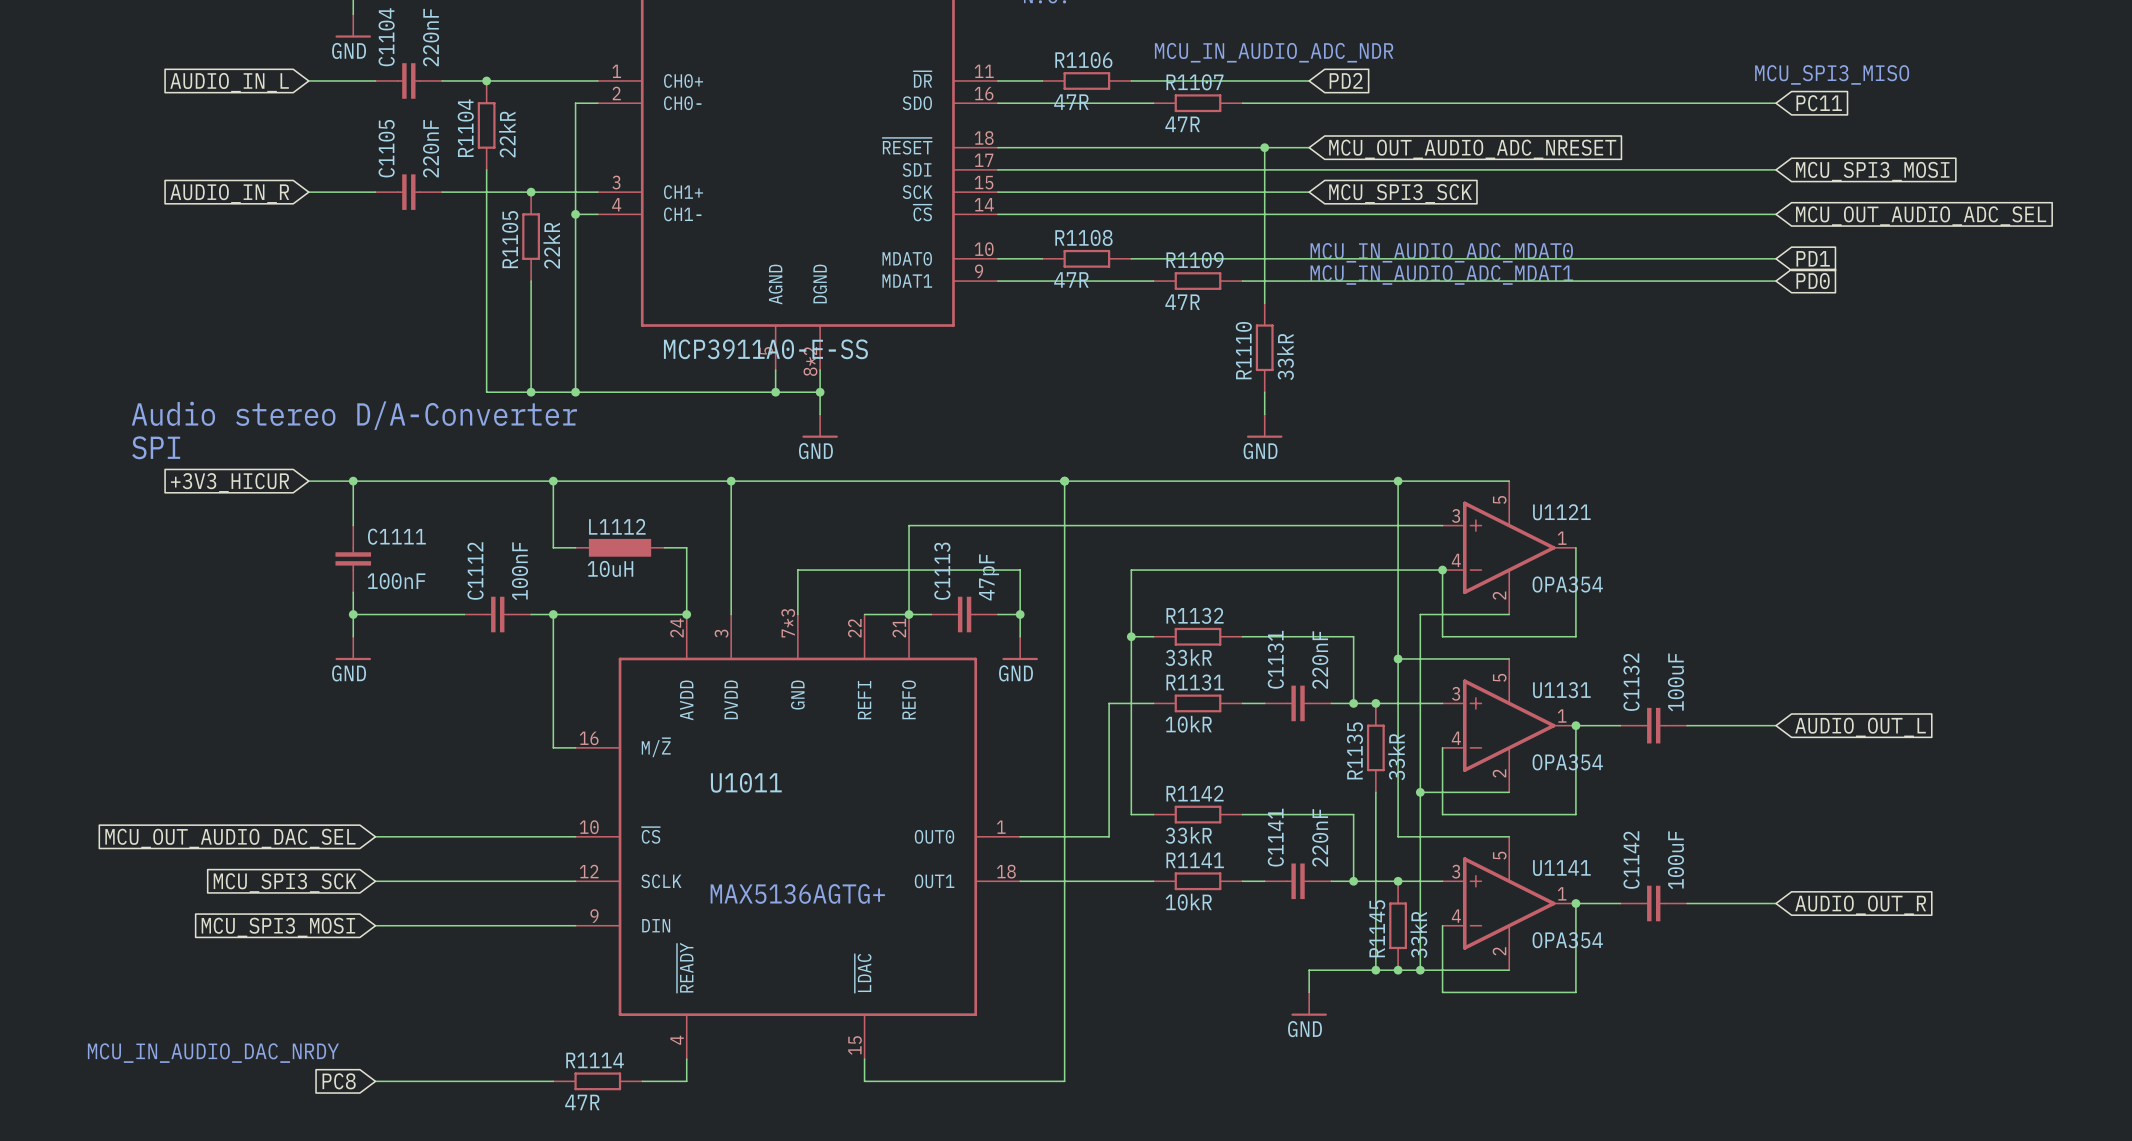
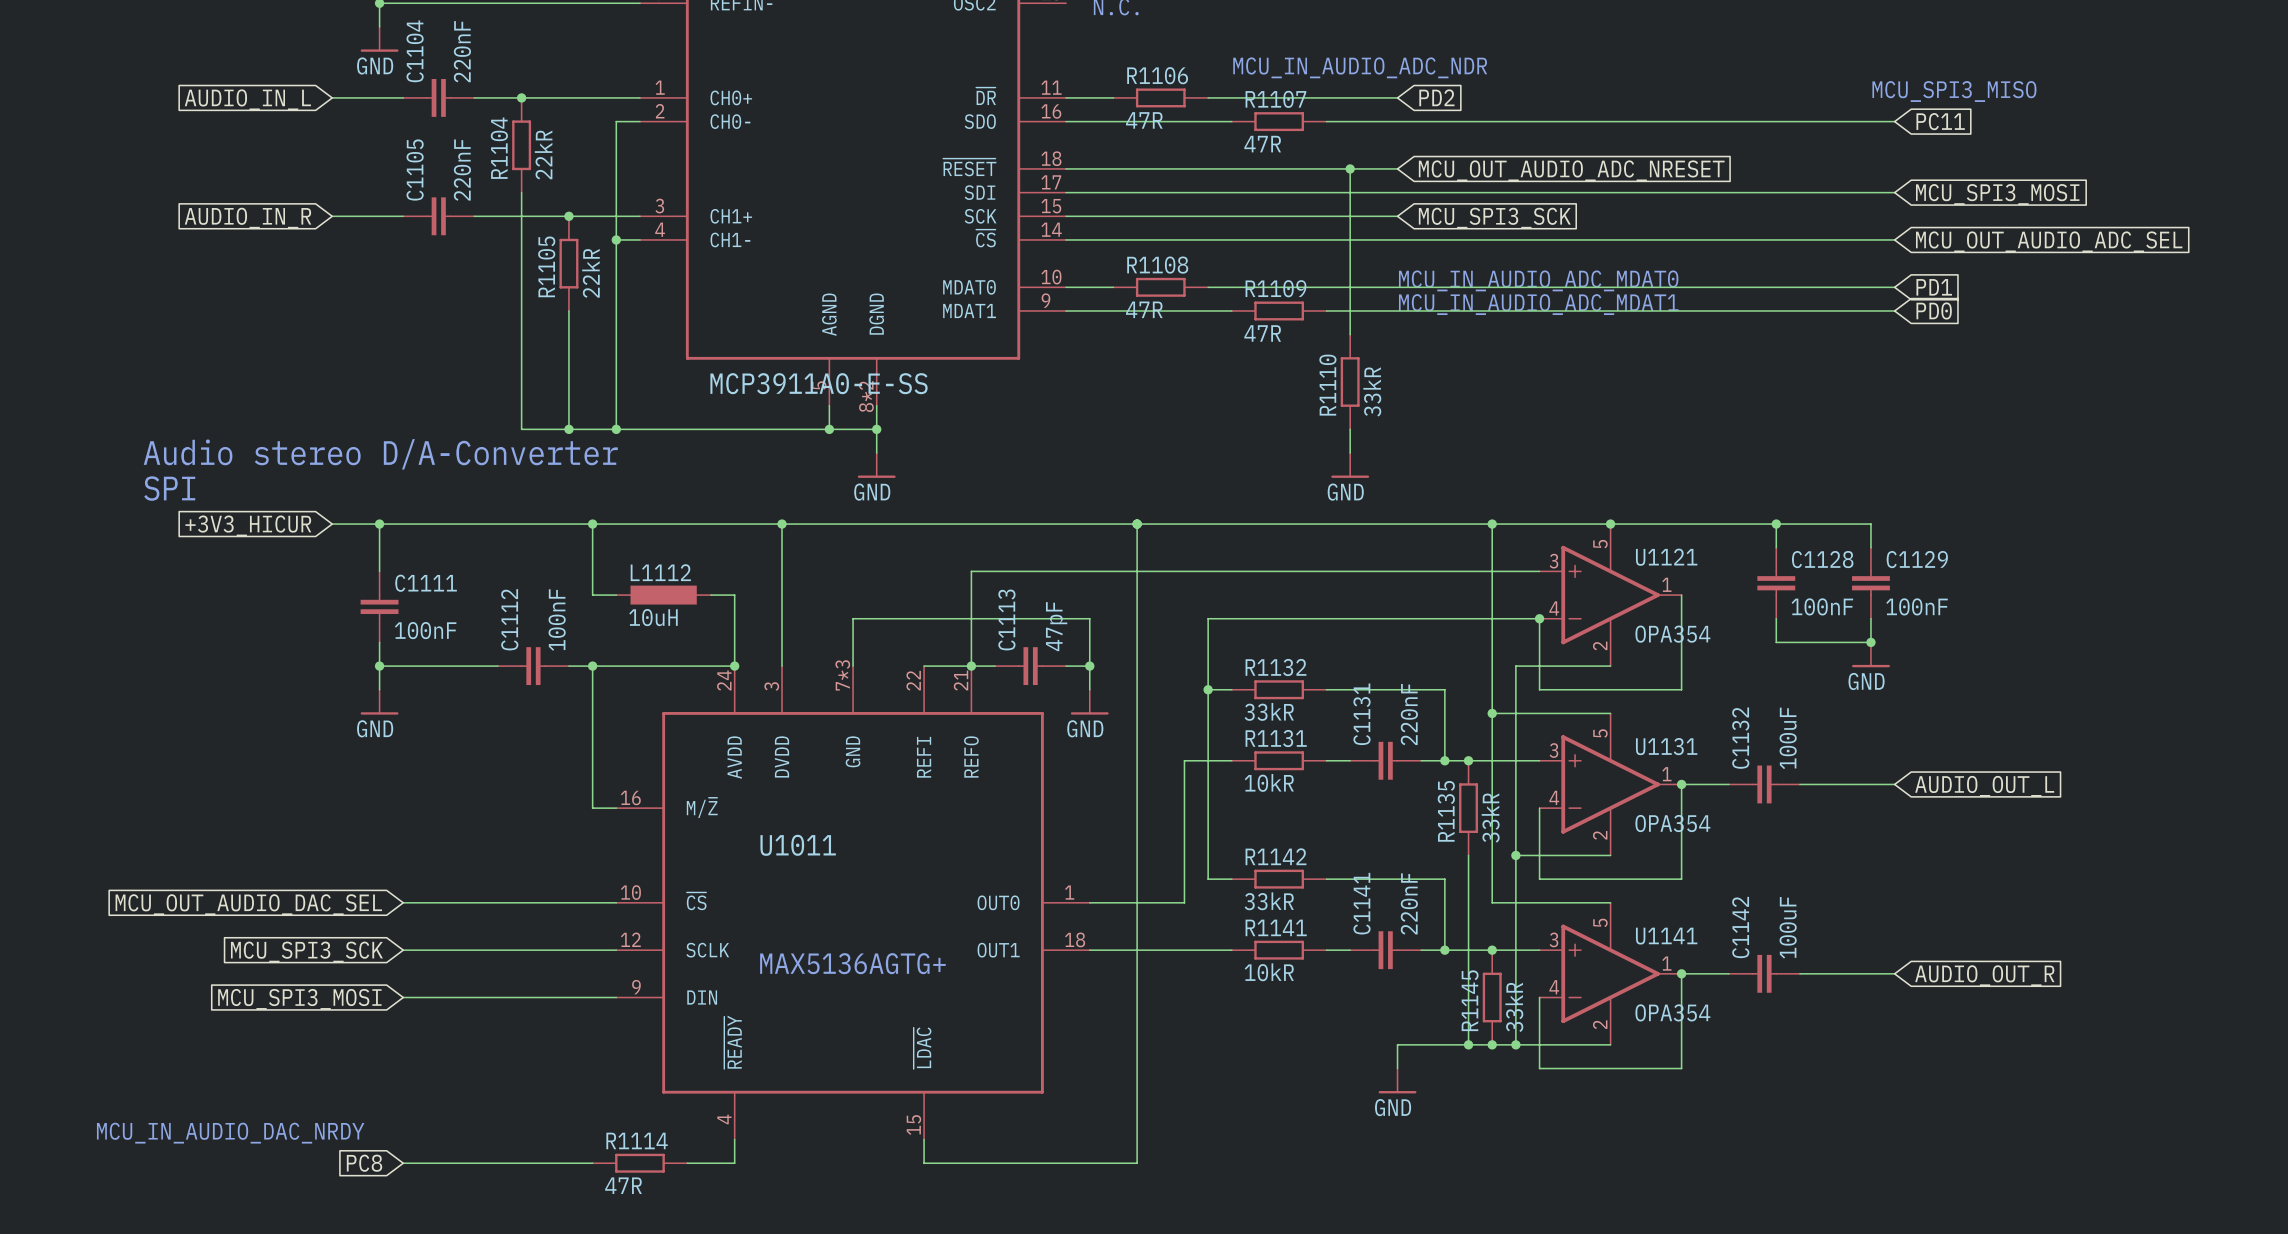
wire: none -> (1610, 524) (1870, 524) (1870, 547)
junction: none -> (1610, 524)
wire: none -> (1776, 524) (1776, 547)
junction: none -> (1776, 524)
C1128: none -> 100nF (1776, 583)
C1129: none -> 100nF (1870, 583)
wire: none -> (1776, 618) (1776, 642) (1870, 642) (1870, 618)
junction: none -> (1870, 642)
power symbol: none -> GND (1870, 654)

